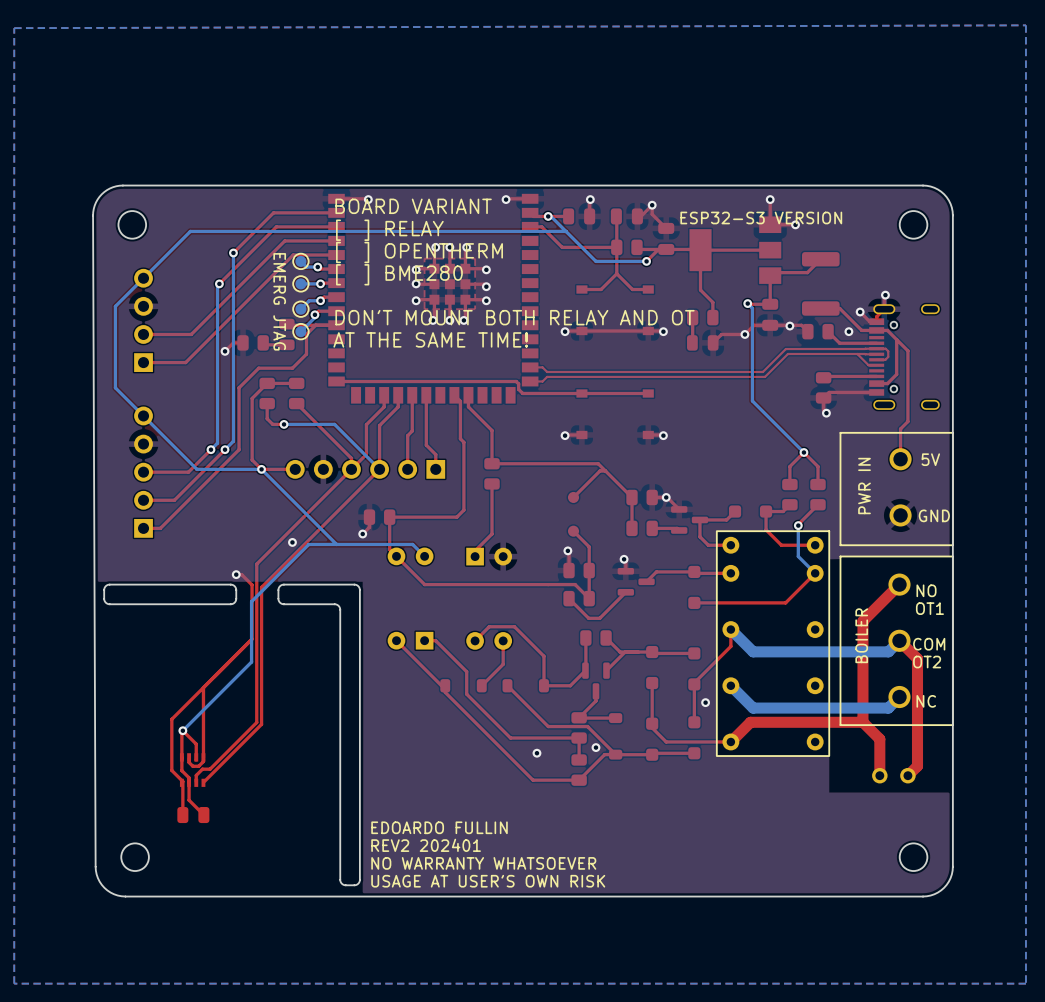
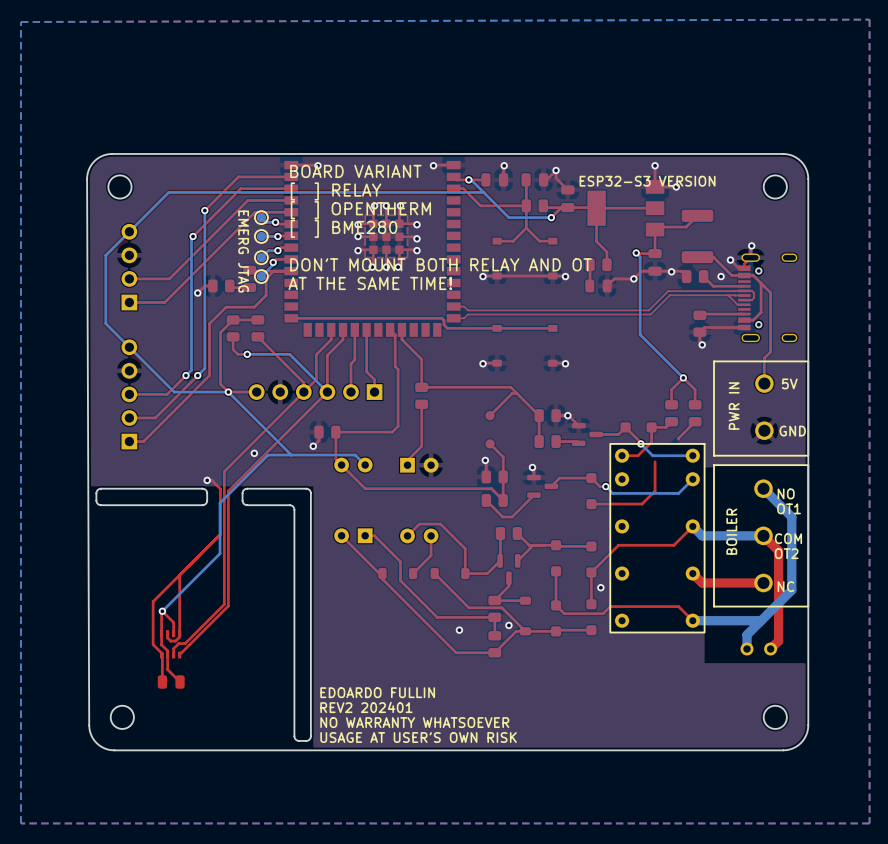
top track: none -> (625, 427) (640, 443)
top track: (699, 519) (699, 536) (708, 545) (730, 545) -> (651, 442) (638, 455) (622, 455)
bottom track: (798, 525) (798, 556) (815, 573) -> (605, 486) (612, 493) (678, 493) (692, 479)
via position: (798, 525) -> (640, 443)
top track: (766, 529) (781, 545) (815, 545) -> none
bottom track: none -> (640, 443) (652, 455) (692, 455)
top track: (730, 573) (695, 573) -> (605, 486) (599, 486) (592, 479)
top track: (815, 573) (785, 602) (754, 602) -> (655, 461) (655, 491) (642, 504)
via: none -> (605, 486)
top track: (899, 584) (862, 621) (862, 722) -> none
bottom track: none -> (763, 488) (791, 516) (791, 590) (747, 634) (747, 649)
top track: (730, 629) (730, 646) (694, 684) -> (692, 526) (673, 545) (618, 545) (591, 572)
bottom track: (730, 629) (753, 651) (888, 651) (899, 640) -> (692, 526) (702, 535) (763, 535)
bottom track: (730, 685) (753, 708) (888, 708) (899, 697) -> none
top track: none -> (692, 573) (702, 583) (763, 583)
top track: (862, 722) (750, 722) (730, 741) (666, 741) (652, 727) (652, 723) -> (692, 620) (678, 606) (610, 606) (603, 613) (564, 613) (556, 605)
top track: (862, 722) (879, 739) (879, 775) -> none
bottom track: none -> (761, 620) (692, 620)

